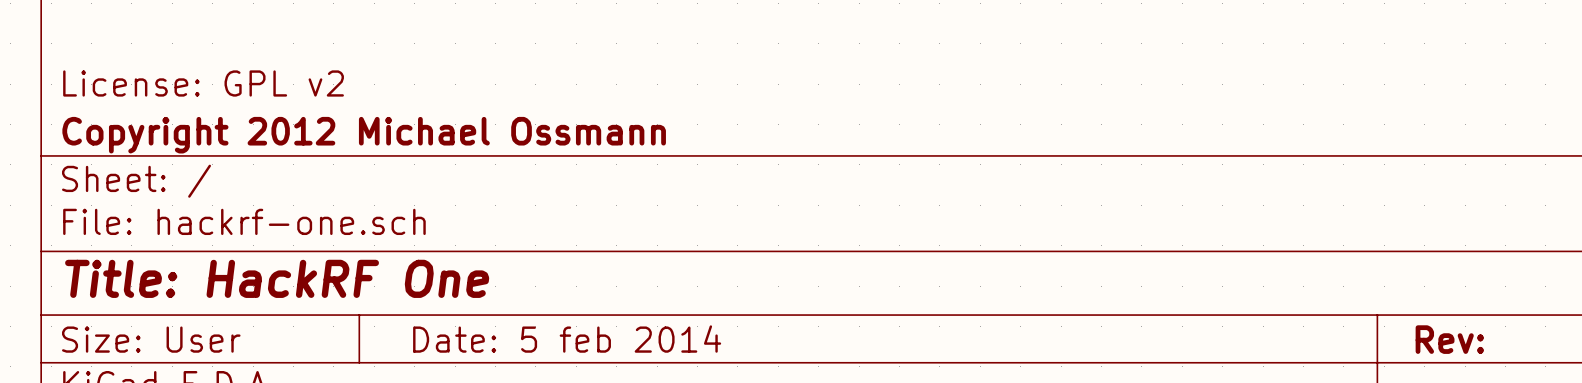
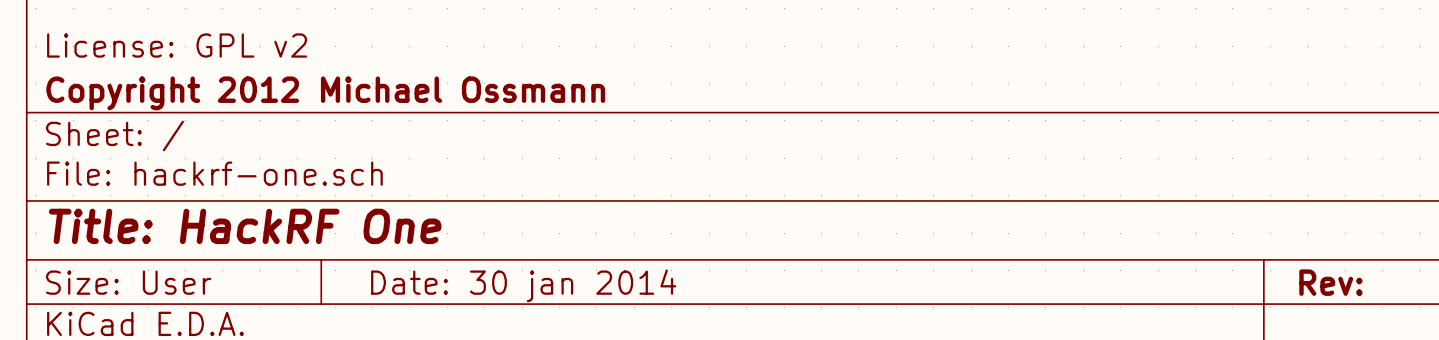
title block: Date: 5 feb 2014 (567, 339) -> Date: 30 jan 2014 (523, 285)

